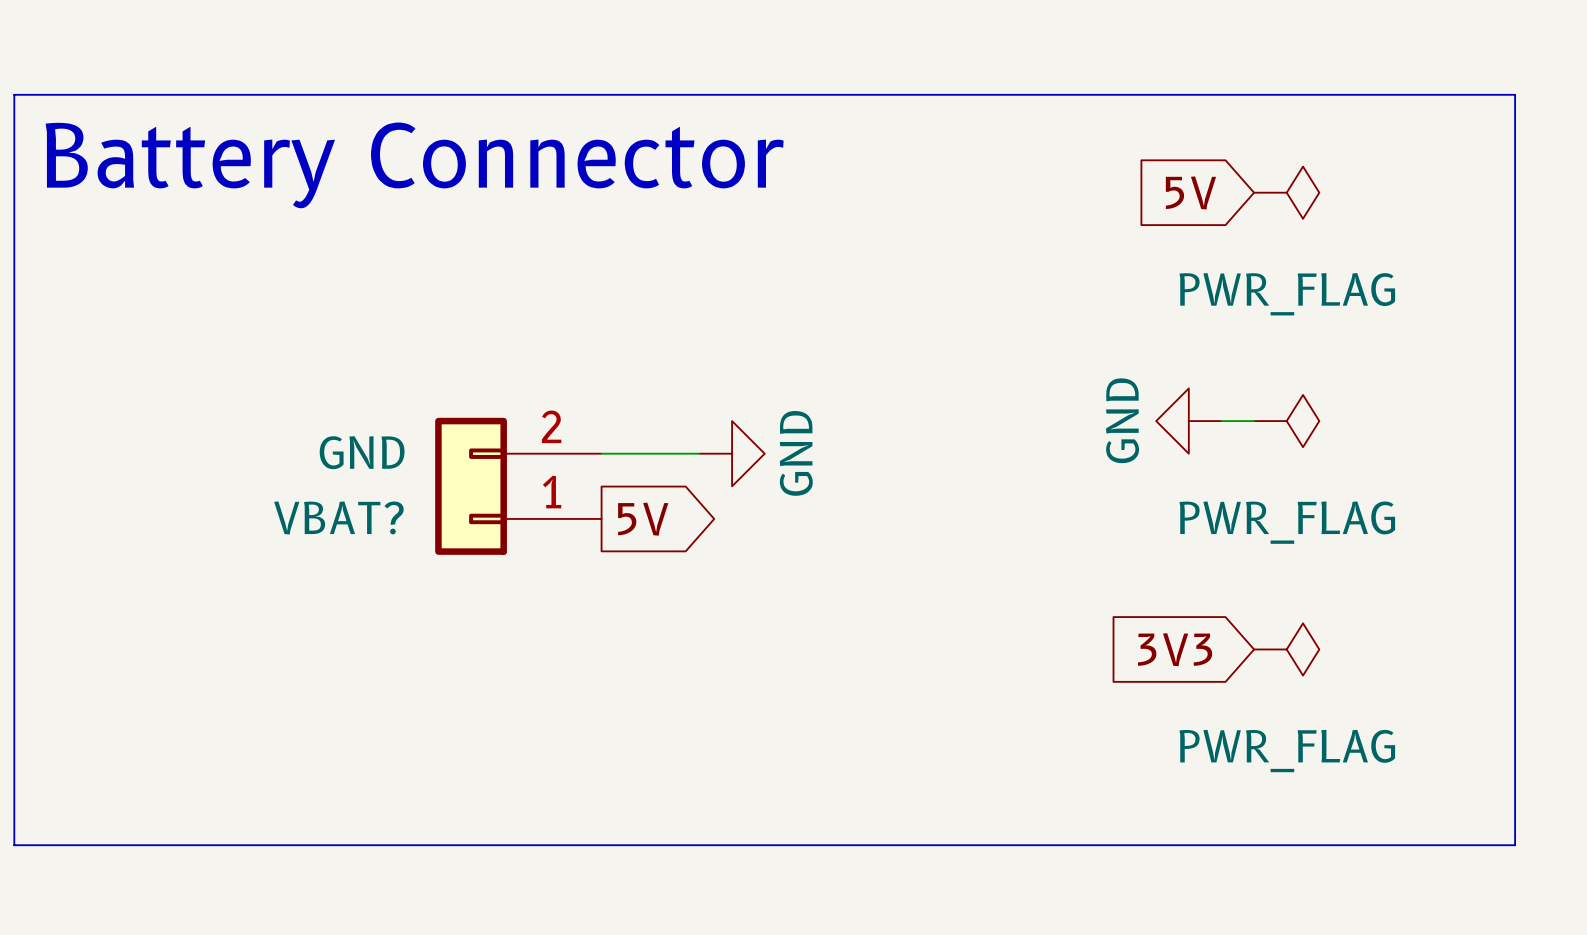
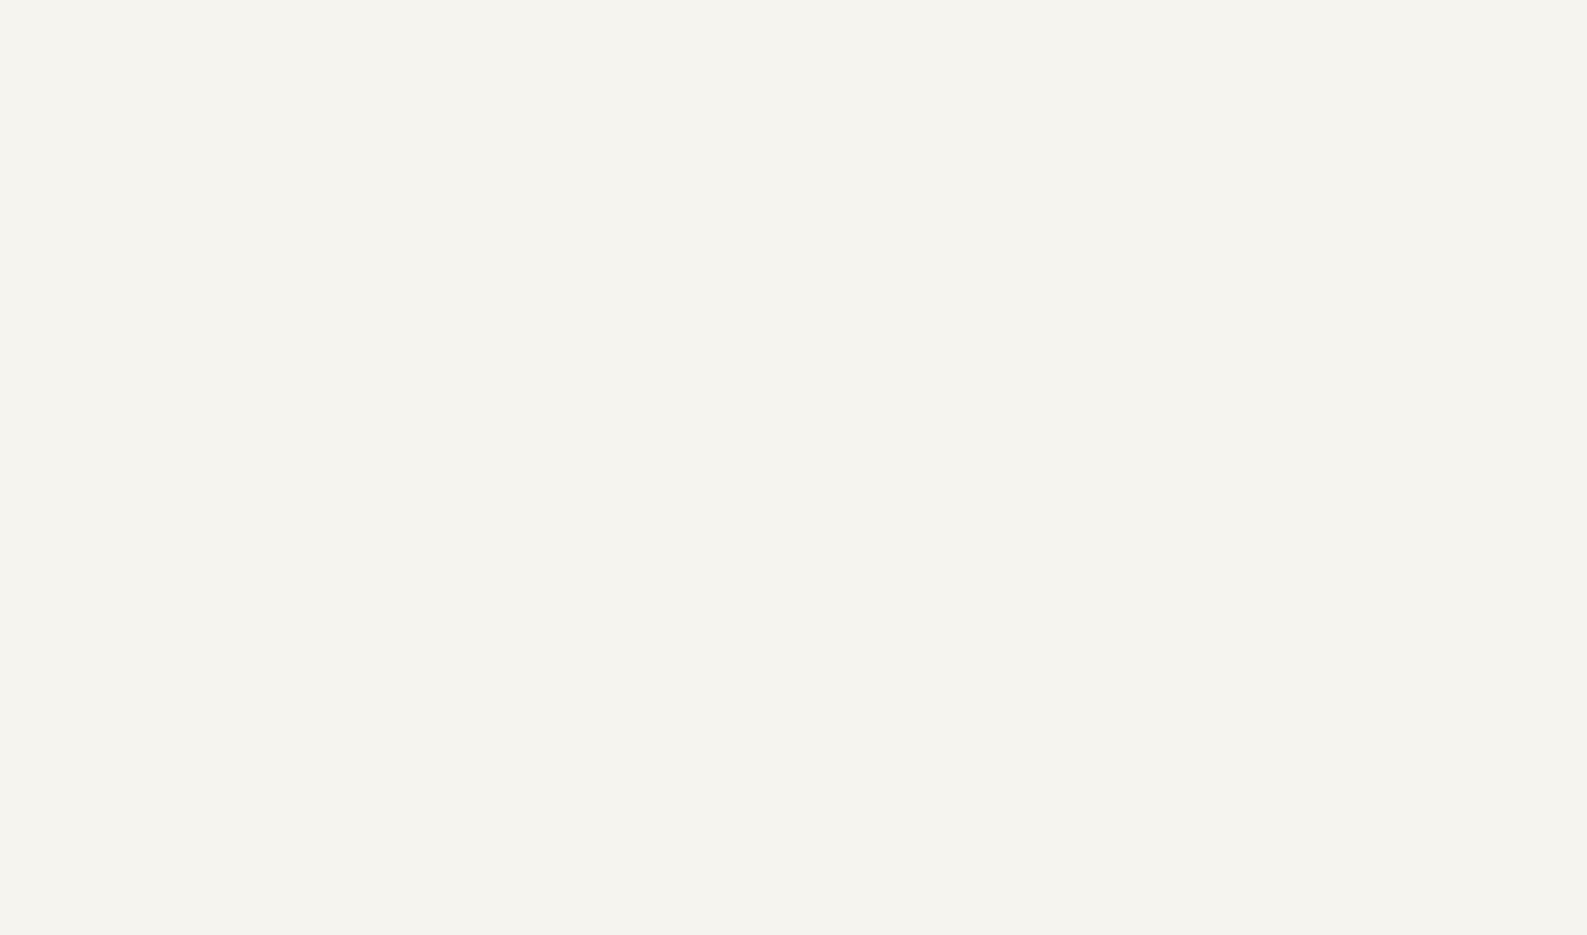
line: (14, 94) (1515, 94) (1515, 845) (14, 845) (14, 94) -> none
text: Battery Connector (414, 165) -> none
global label: 5V (1190, 192) -> none
power symbol: PWR_FLAG (1286, 192) -> none
power symbol: GND (1188, 421) -> none
wire: (1221, 421) (1254, 421) -> none
power symbol: PWR_FLAG (1286, 421) -> none
wire: (601, 453) (699, 453) -> none
power symbol: GND (732, 453) -> none
VBAT?: GND (518, 486) -> none
global label: 5V (643, 519) -> none
global label: 3V3 (1175, 649) -> none
power symbol: PWR_FLAG (1286, 649) -> none

